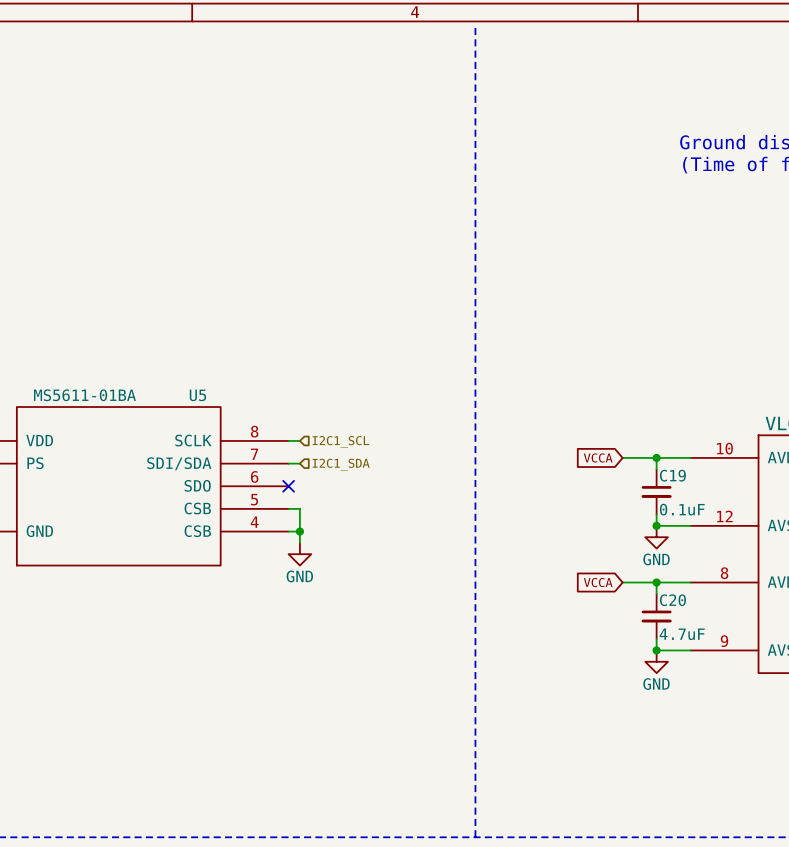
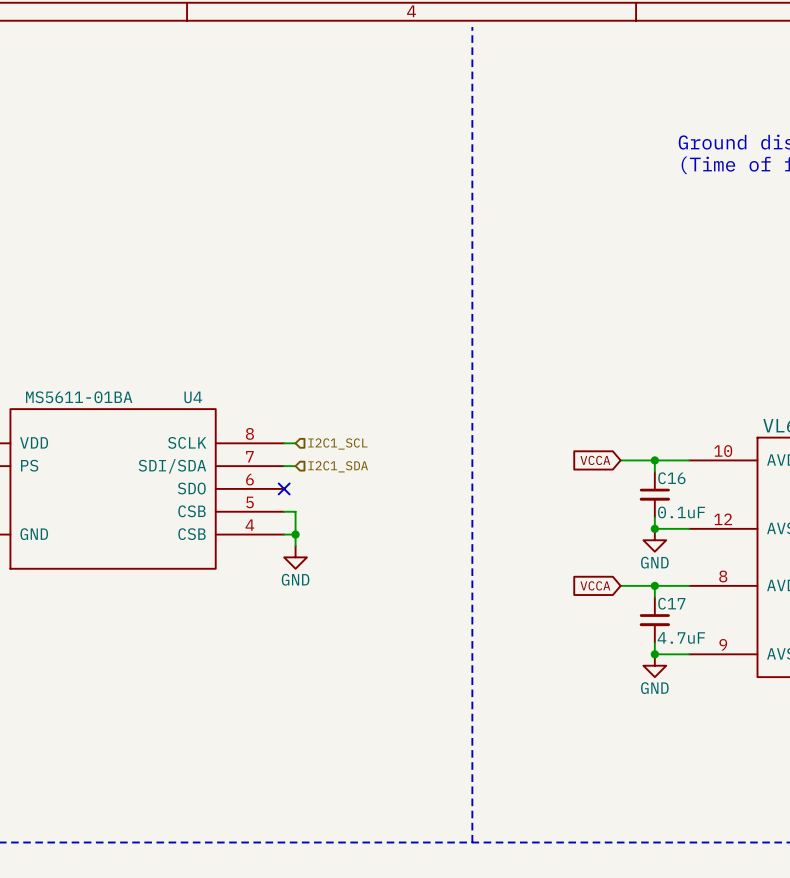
U5 name: U5 (197, 395) -> U4 (193, 397)
C19 name: C19 (672, 475) -> C16 (671, 478)
C20 name: C20 (672, 600) -> C17 (671, 603)

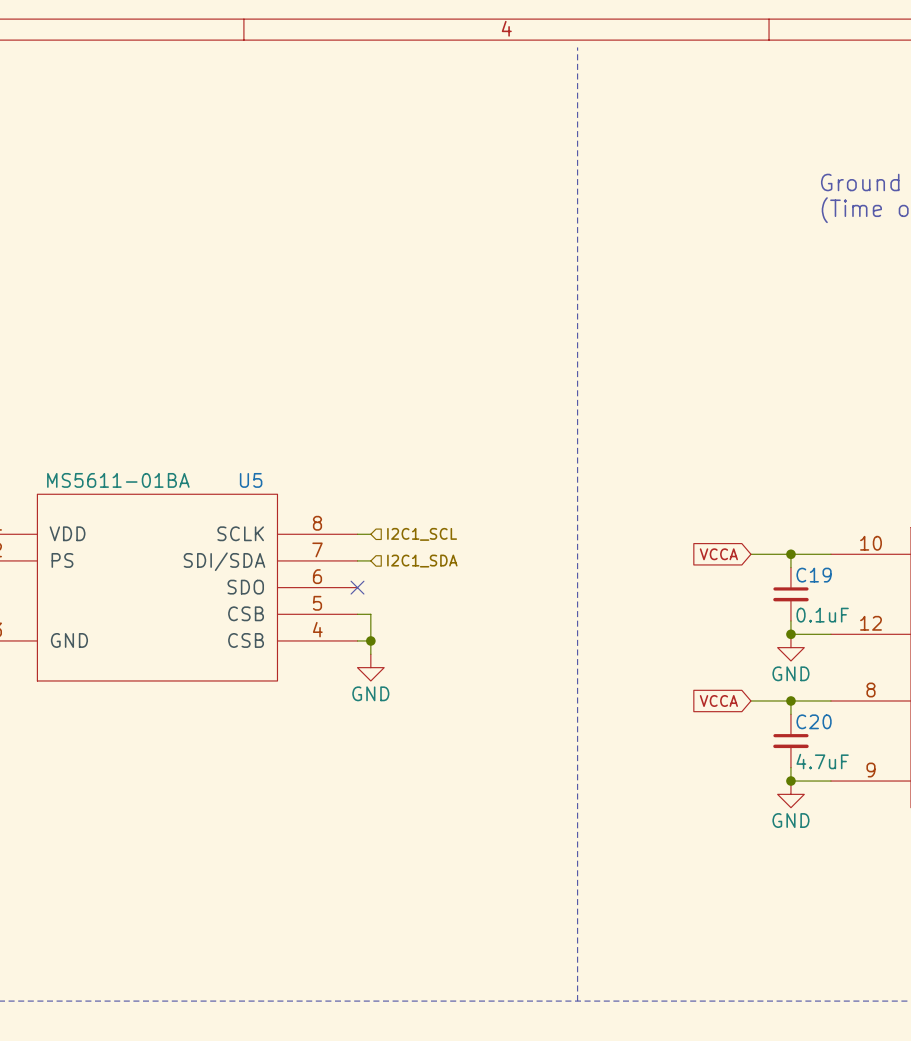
U4 name: U4 (193, 397) -> U5 (251, 480)
C16 name: C16 (671, 478) -> C19 (814, 575)
C17 name: C17 (671, 603) -> C20 (814, 721)

